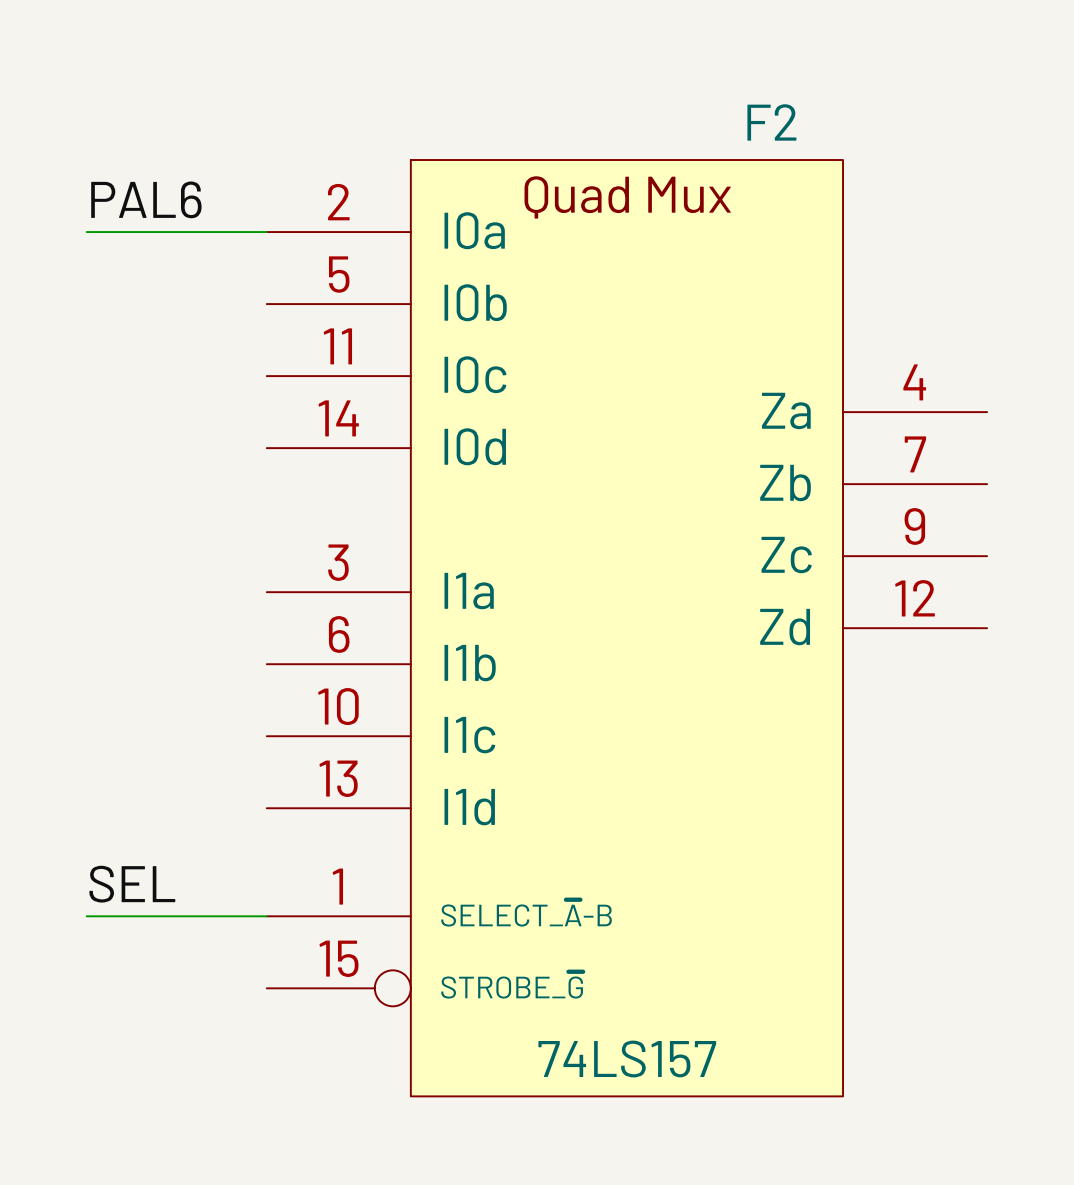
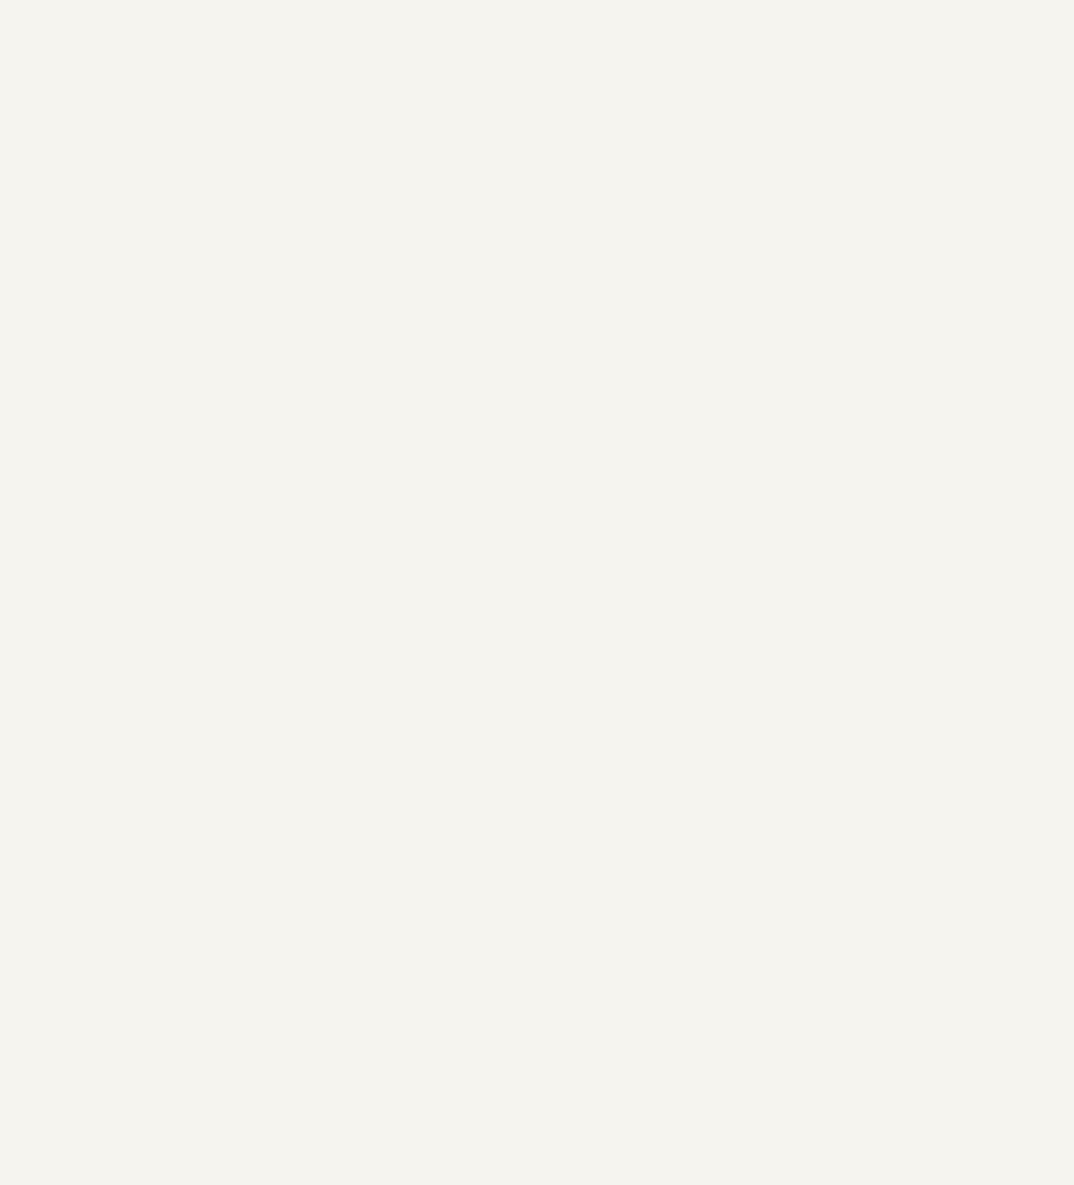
label: PAL6 (146, 199) -> none
wire: (86, 232) (266, 232) -> none
F2: 74LS157 (626, 628) -> none
label: SEL (132, 884) -> none
wire: (86, 916) (266, 916) -> none

